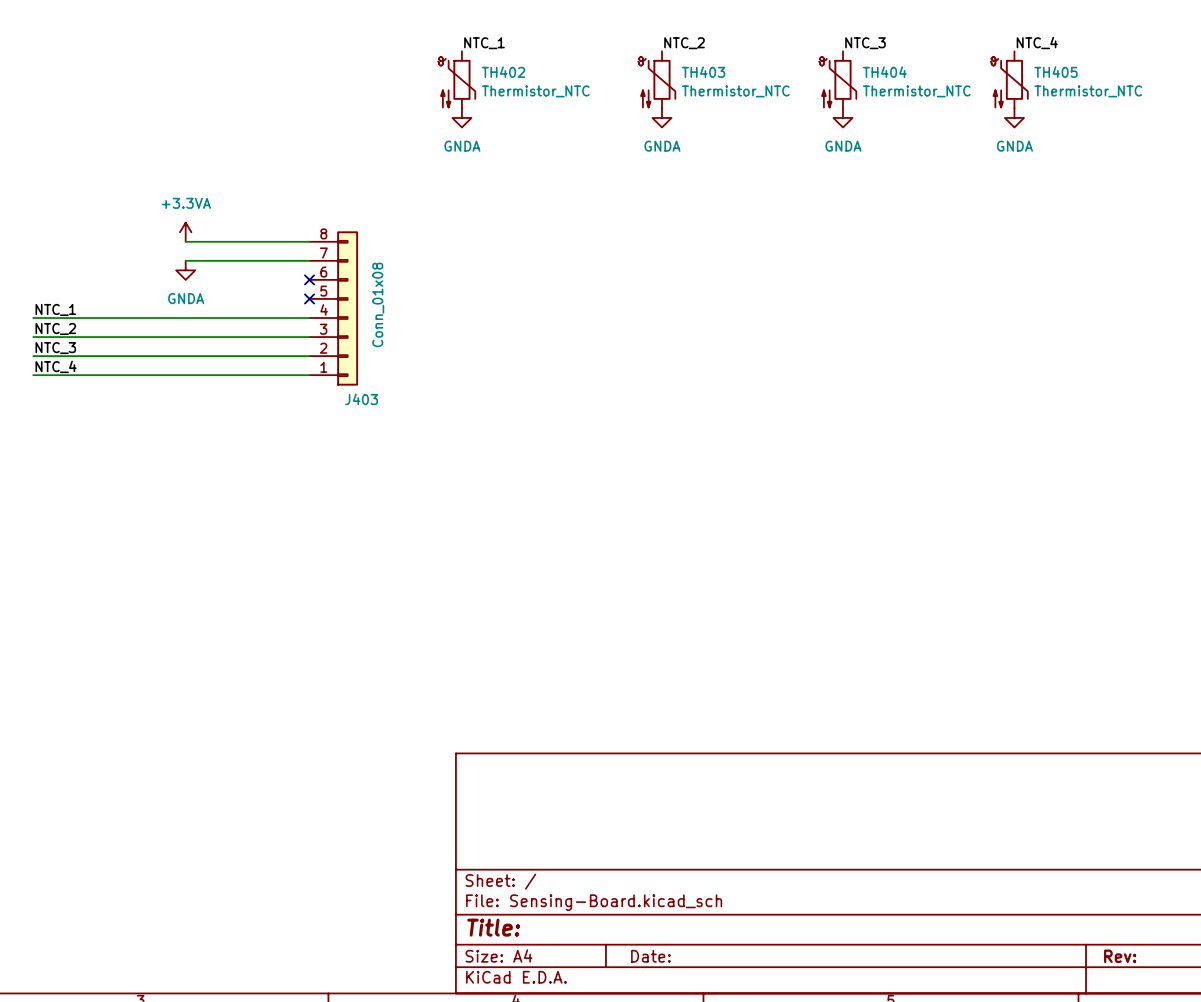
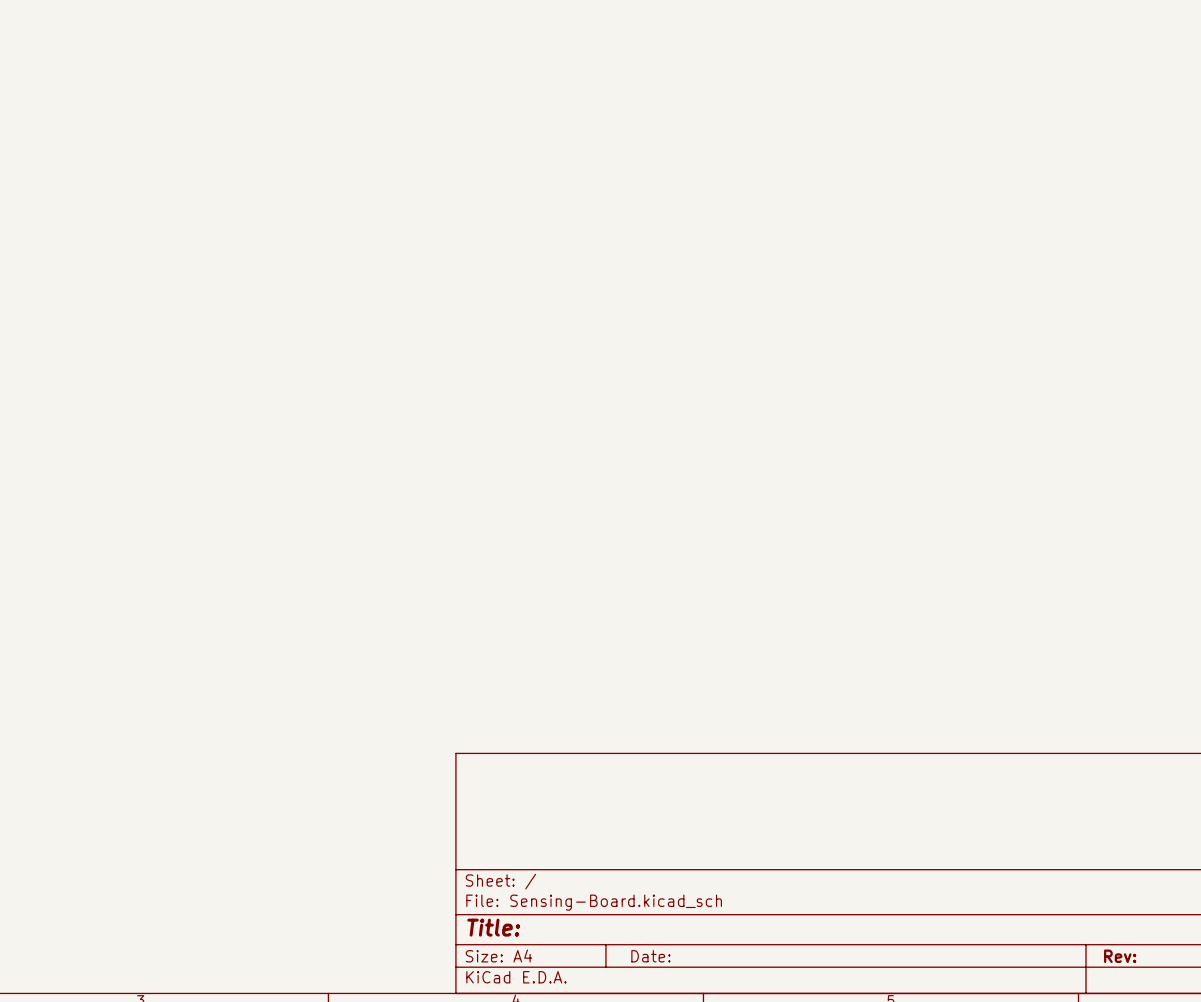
label: NTC_1 (484, 43) -> none
label: NTC_2 (684, 43) -> none
label: NTC_3 (865, 43) -> none
label: NTC_4 (1037, 43) -> none
TH402: Thermistor_NTC (456, 79) -> none
TH403: Thermistor_NTC (656, 79) -> none
TH404: Thermistor_NTC (837, 79) -> none
TH405: Thermistor_NTC (1009, 79) -> none
power symbol: GNDA (461, 117) -> none
power symbol: GNDA (661, 117) -> none
power symbol: GNDA (842, 117) -> none
power symbol: GNDA (1014, 117) -> none
power symbol: +3.3VA (185, 232) -> none
wire: (185, 241) (309, 241) -> none
wire: (185, 260) (309, 260) -> none
power symbol: GNDA (185, 270) -> none
no-connect mark: (309, 279) -> none
no-connect mark: (309, 298) -> none
J403: Conn_01x08 (333, 308) -> none
label: NTC_1 (55, 309) -> none
wire: (33, 318) (309, 318) -> none
label: NTC_2 (55, 329) -> none
wire: (33, 337) (309, 337) -> none
label: NTC_3 (55, 348) -> none
wire: (33, 356) (309, 356) -> none
label: NTC_4 (56, 366) -> none
wire: (33, 375) (309, 375) -> none

